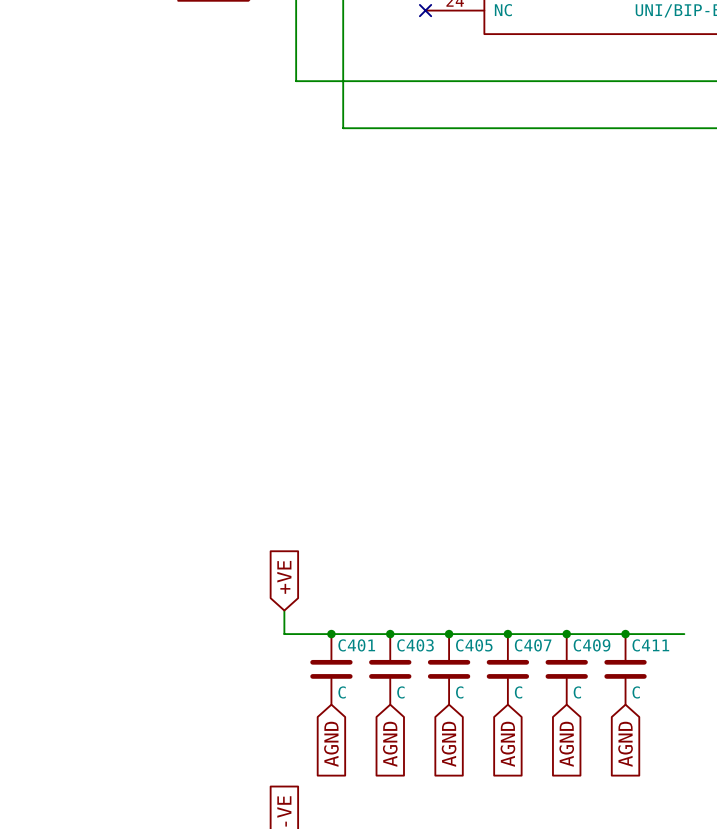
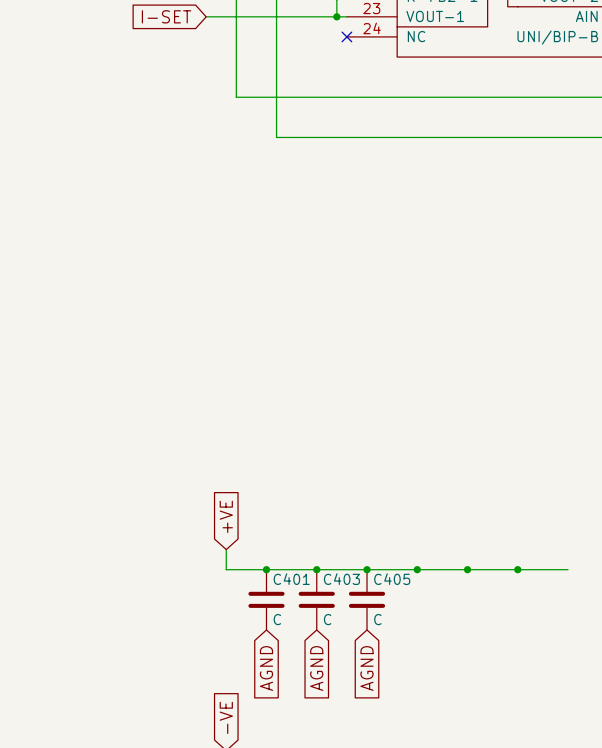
C407: C (507, 669) -> none
C409: C (566, 669) -> none
C411: C (625, 669) -> none
global label: AGND (507, 744) -> none
global label: AGND (566, 744) -> none
global label: AGND (625, 744) -> none

